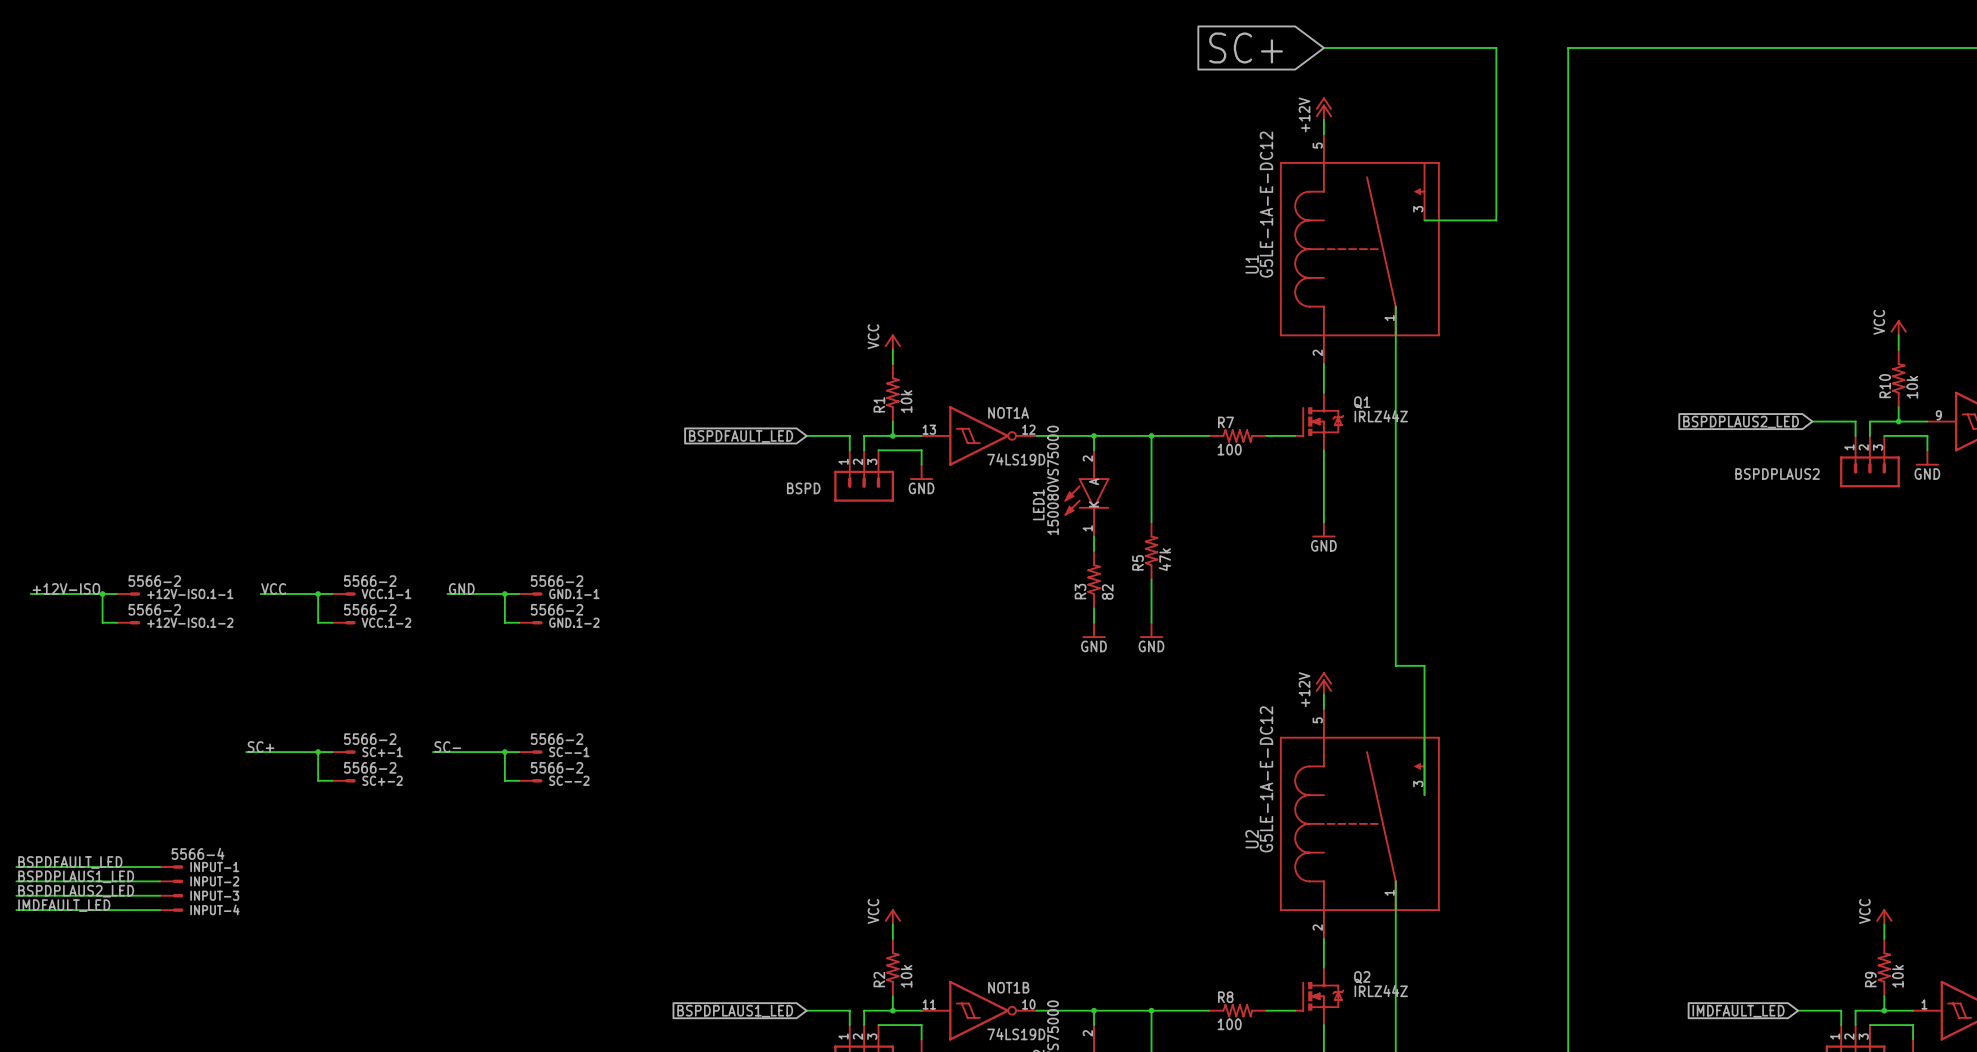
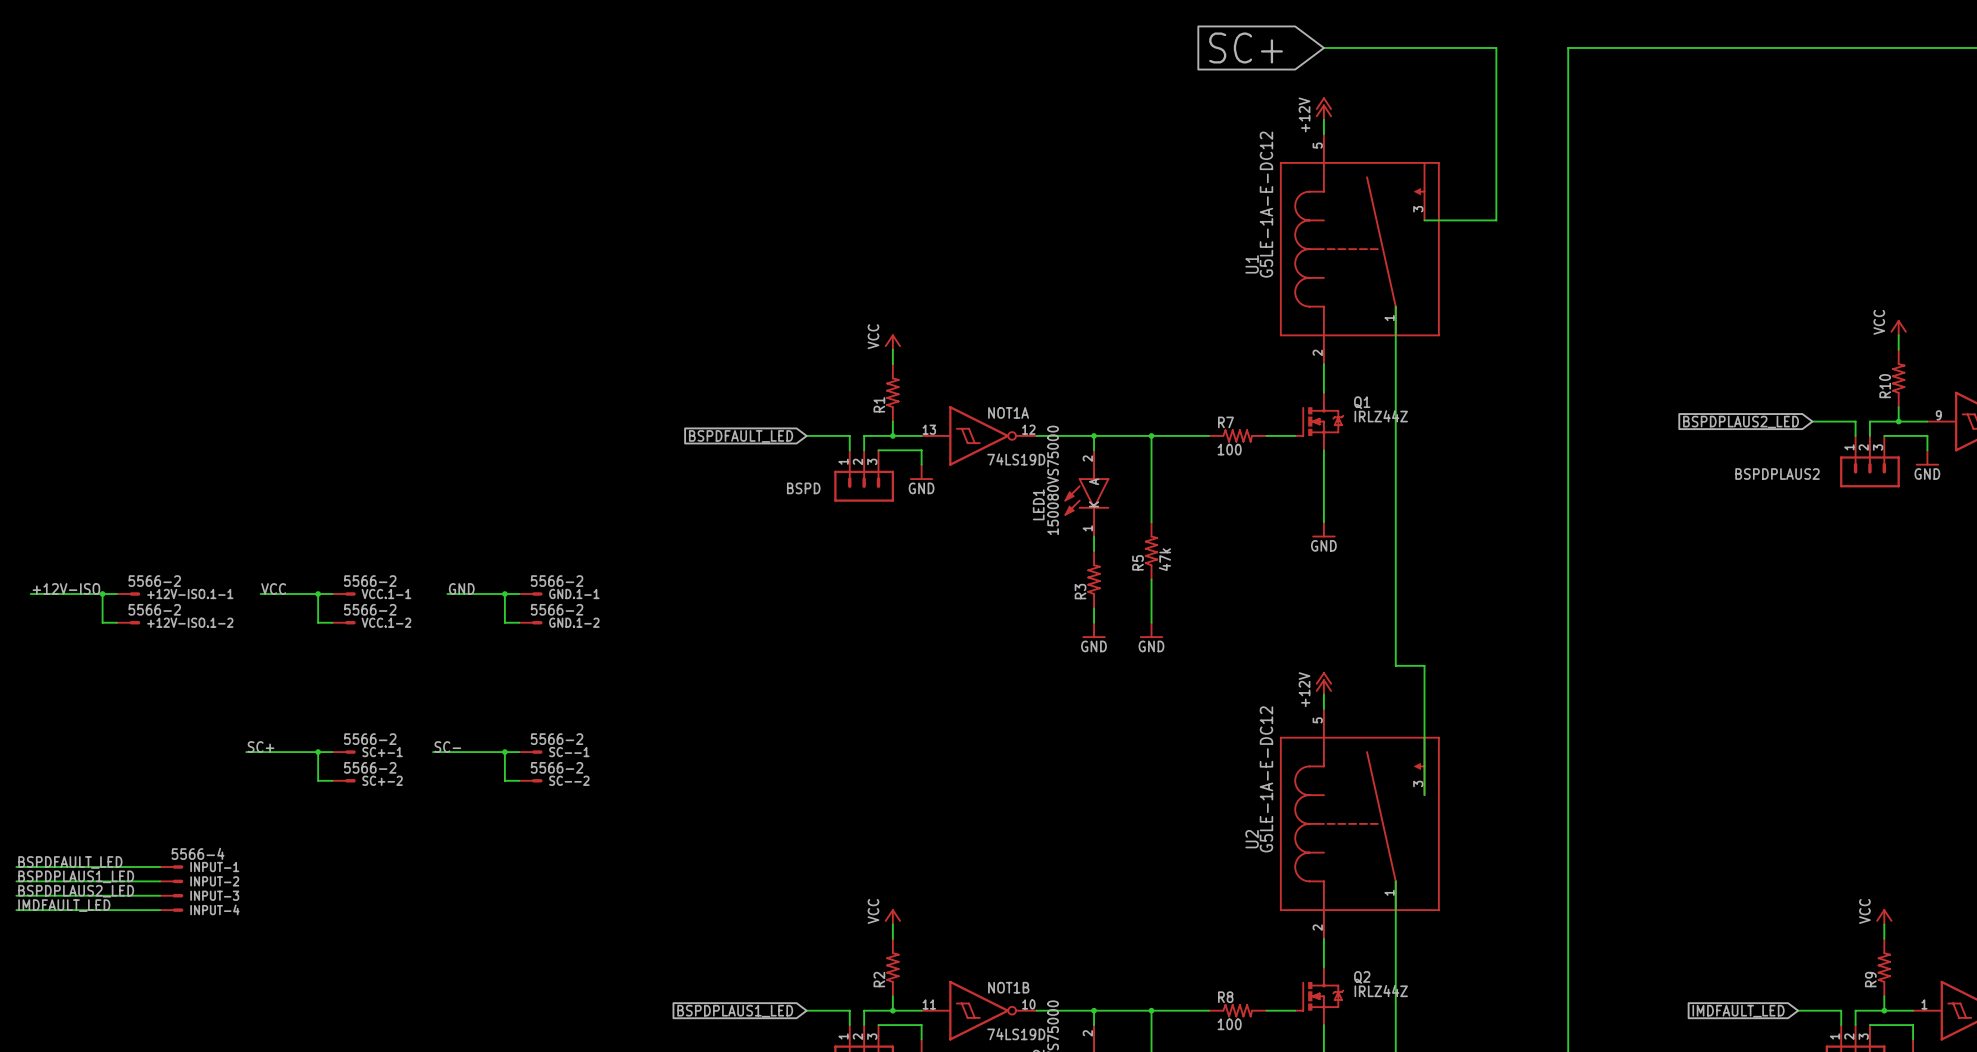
R10 value: 10k (1912, 387) -> none
R1 value: 10k (906, 401) -> none
R3 value: 82 (1107, 592) -> none
R2 value: 10k (906, 976) -> none
R9 value: 10k (1897, 976) -> none

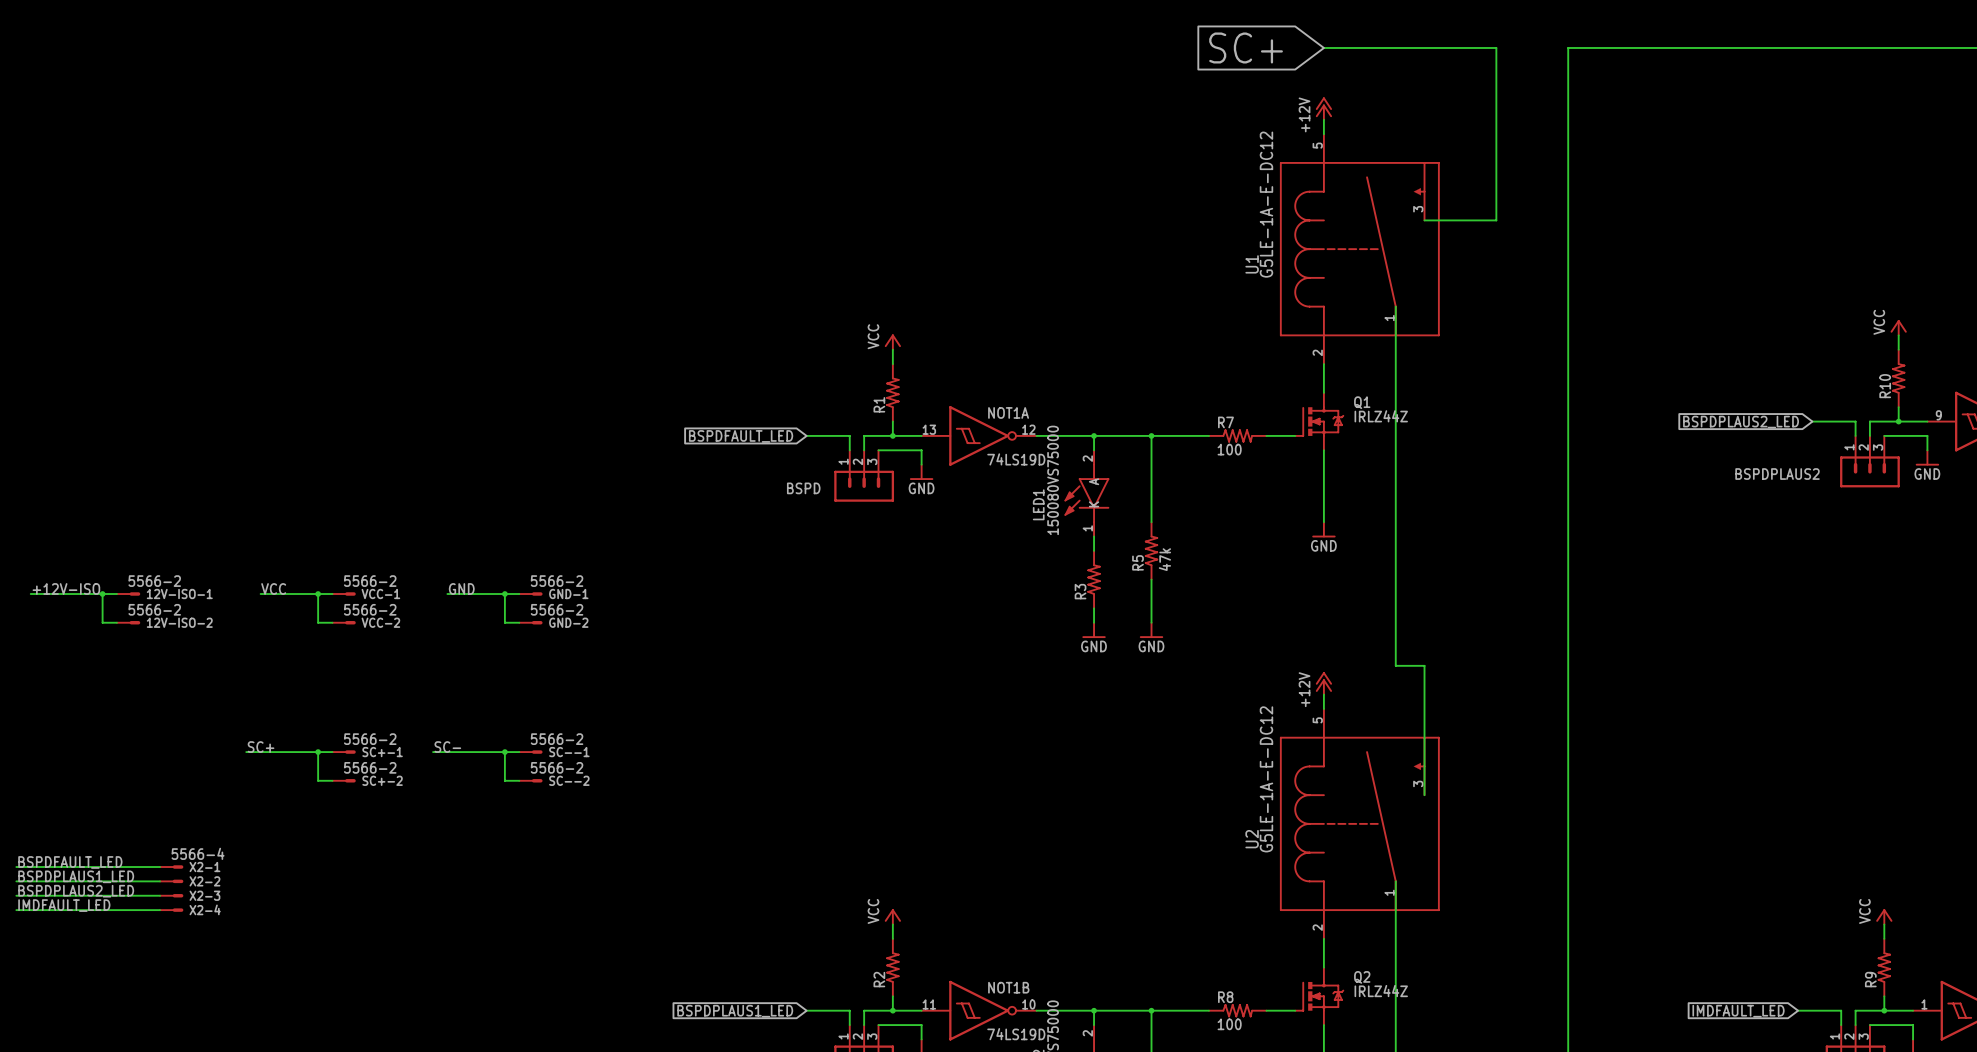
+12V-ISO.1-1 name: +12V-ISO.1-1 (190, 594) -> 12V-ISO-1 (179, 594)
VCC.1-1 name: VCC.1-1 (386, 594) -> VCC-1 (380, 594)
GND.1-1 name: GND.1-1 (574, 594) -> GND-1 (568, 594)
+12V-ISO.1-2 name: +12V-ISO.1-2 (190, 622) -> 12V-ISO-2 (179, 622)
VCC.1-2 name: VCC.1-2 (386, 622) -> VCC-2 (380, 622)
GND.1-2 name: GND.1-2 (574, 622) -> GND-2 (568, 622)
INPUT-1 name: INPUT-1 (214, 867) -> X2-1 (204, 867)
INPUT-2 name: INPUT-2 (214, 881) -> X2-2 (204, 881)
INPUT-3 name: INPUT-3 (214, 895) -> X2-3 (204, 895)
INPUT-4 name: INPUT-4 (214, 909) -> X2-4 (205, 909)

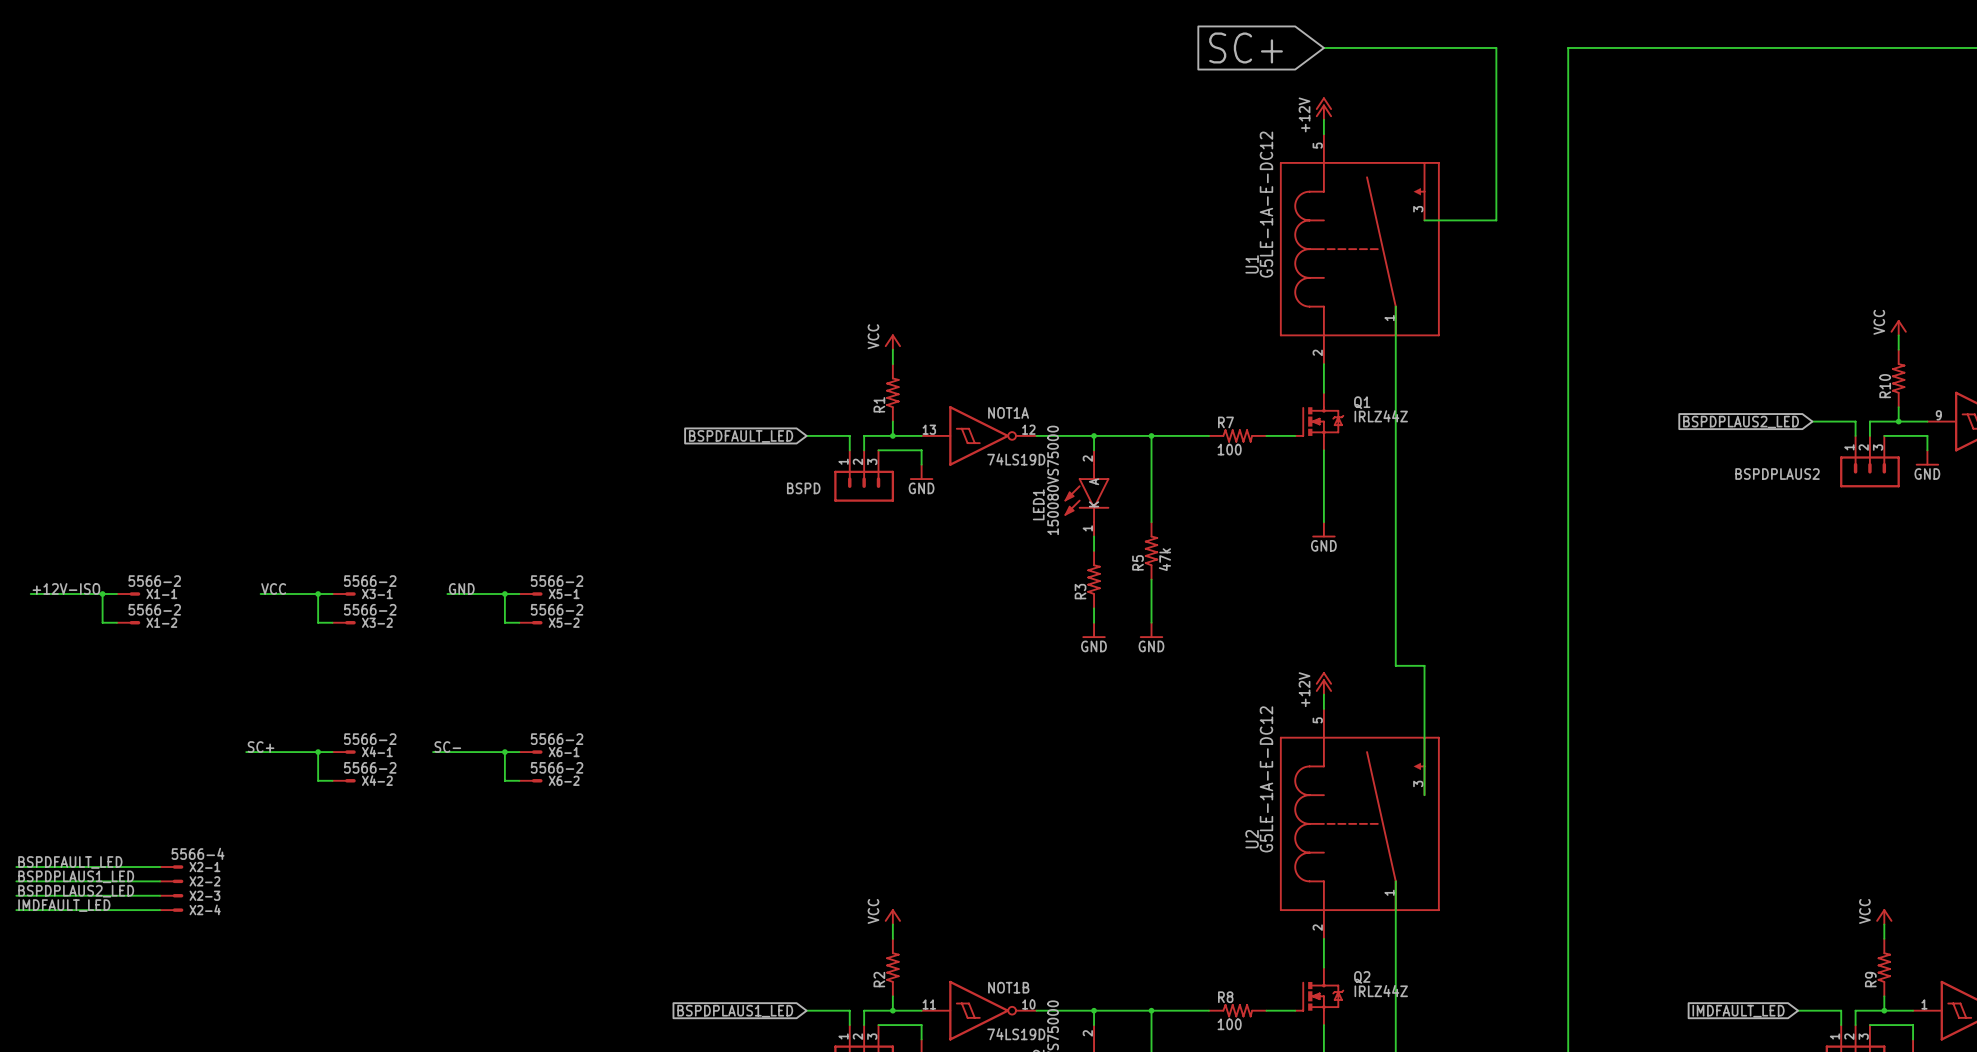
12V-ISO-1 name: 12V-ISO-1 (179, 594) -> X1-1 (161, 594)
VCC-1 name: VCC-1 (380, 594) -> X3-1 (377, 594)
GND-1 name: GND-1 (568, 594) -> X5-1 (564, 594)
12V-ISO-2 name: 12V-ISO-2 (179, 622) -> X1-2 (161, 622)
VCC-2 name: VCC-2 (380, 622) -> X3-2 (377, 622)
GND-2 name: GND-2 (568, 622) -> X5-2 (564, 622)
SC+-1 name: SC+-1 (382, 752) -> X4-1 (377, 751)
SC--1 name: SC--1 (569, 752) -> X6-1 (564, 752)
SC+-2 name: SC+-2 (382, 780) -> X4-2 (377, 780)
SC--2 name: SC--2 (569, 780) -> X6-2 (564, 780)

